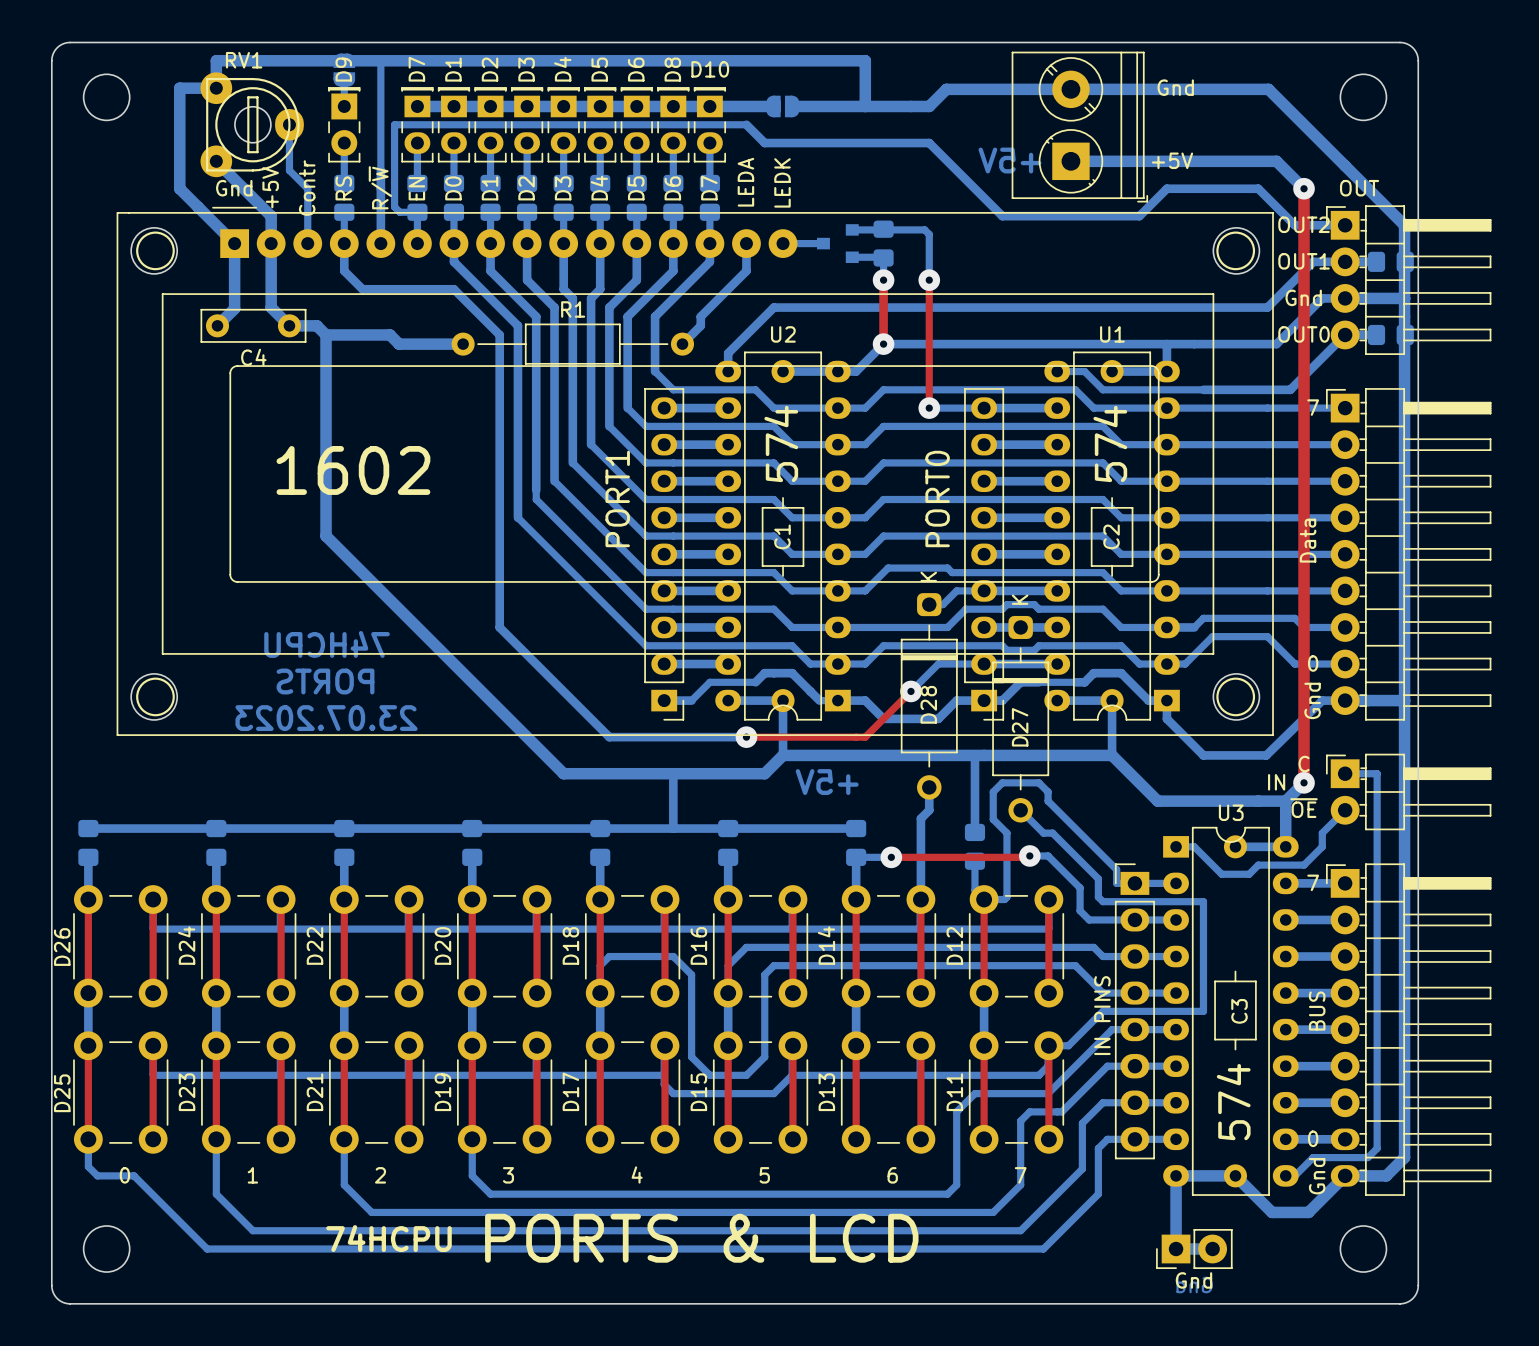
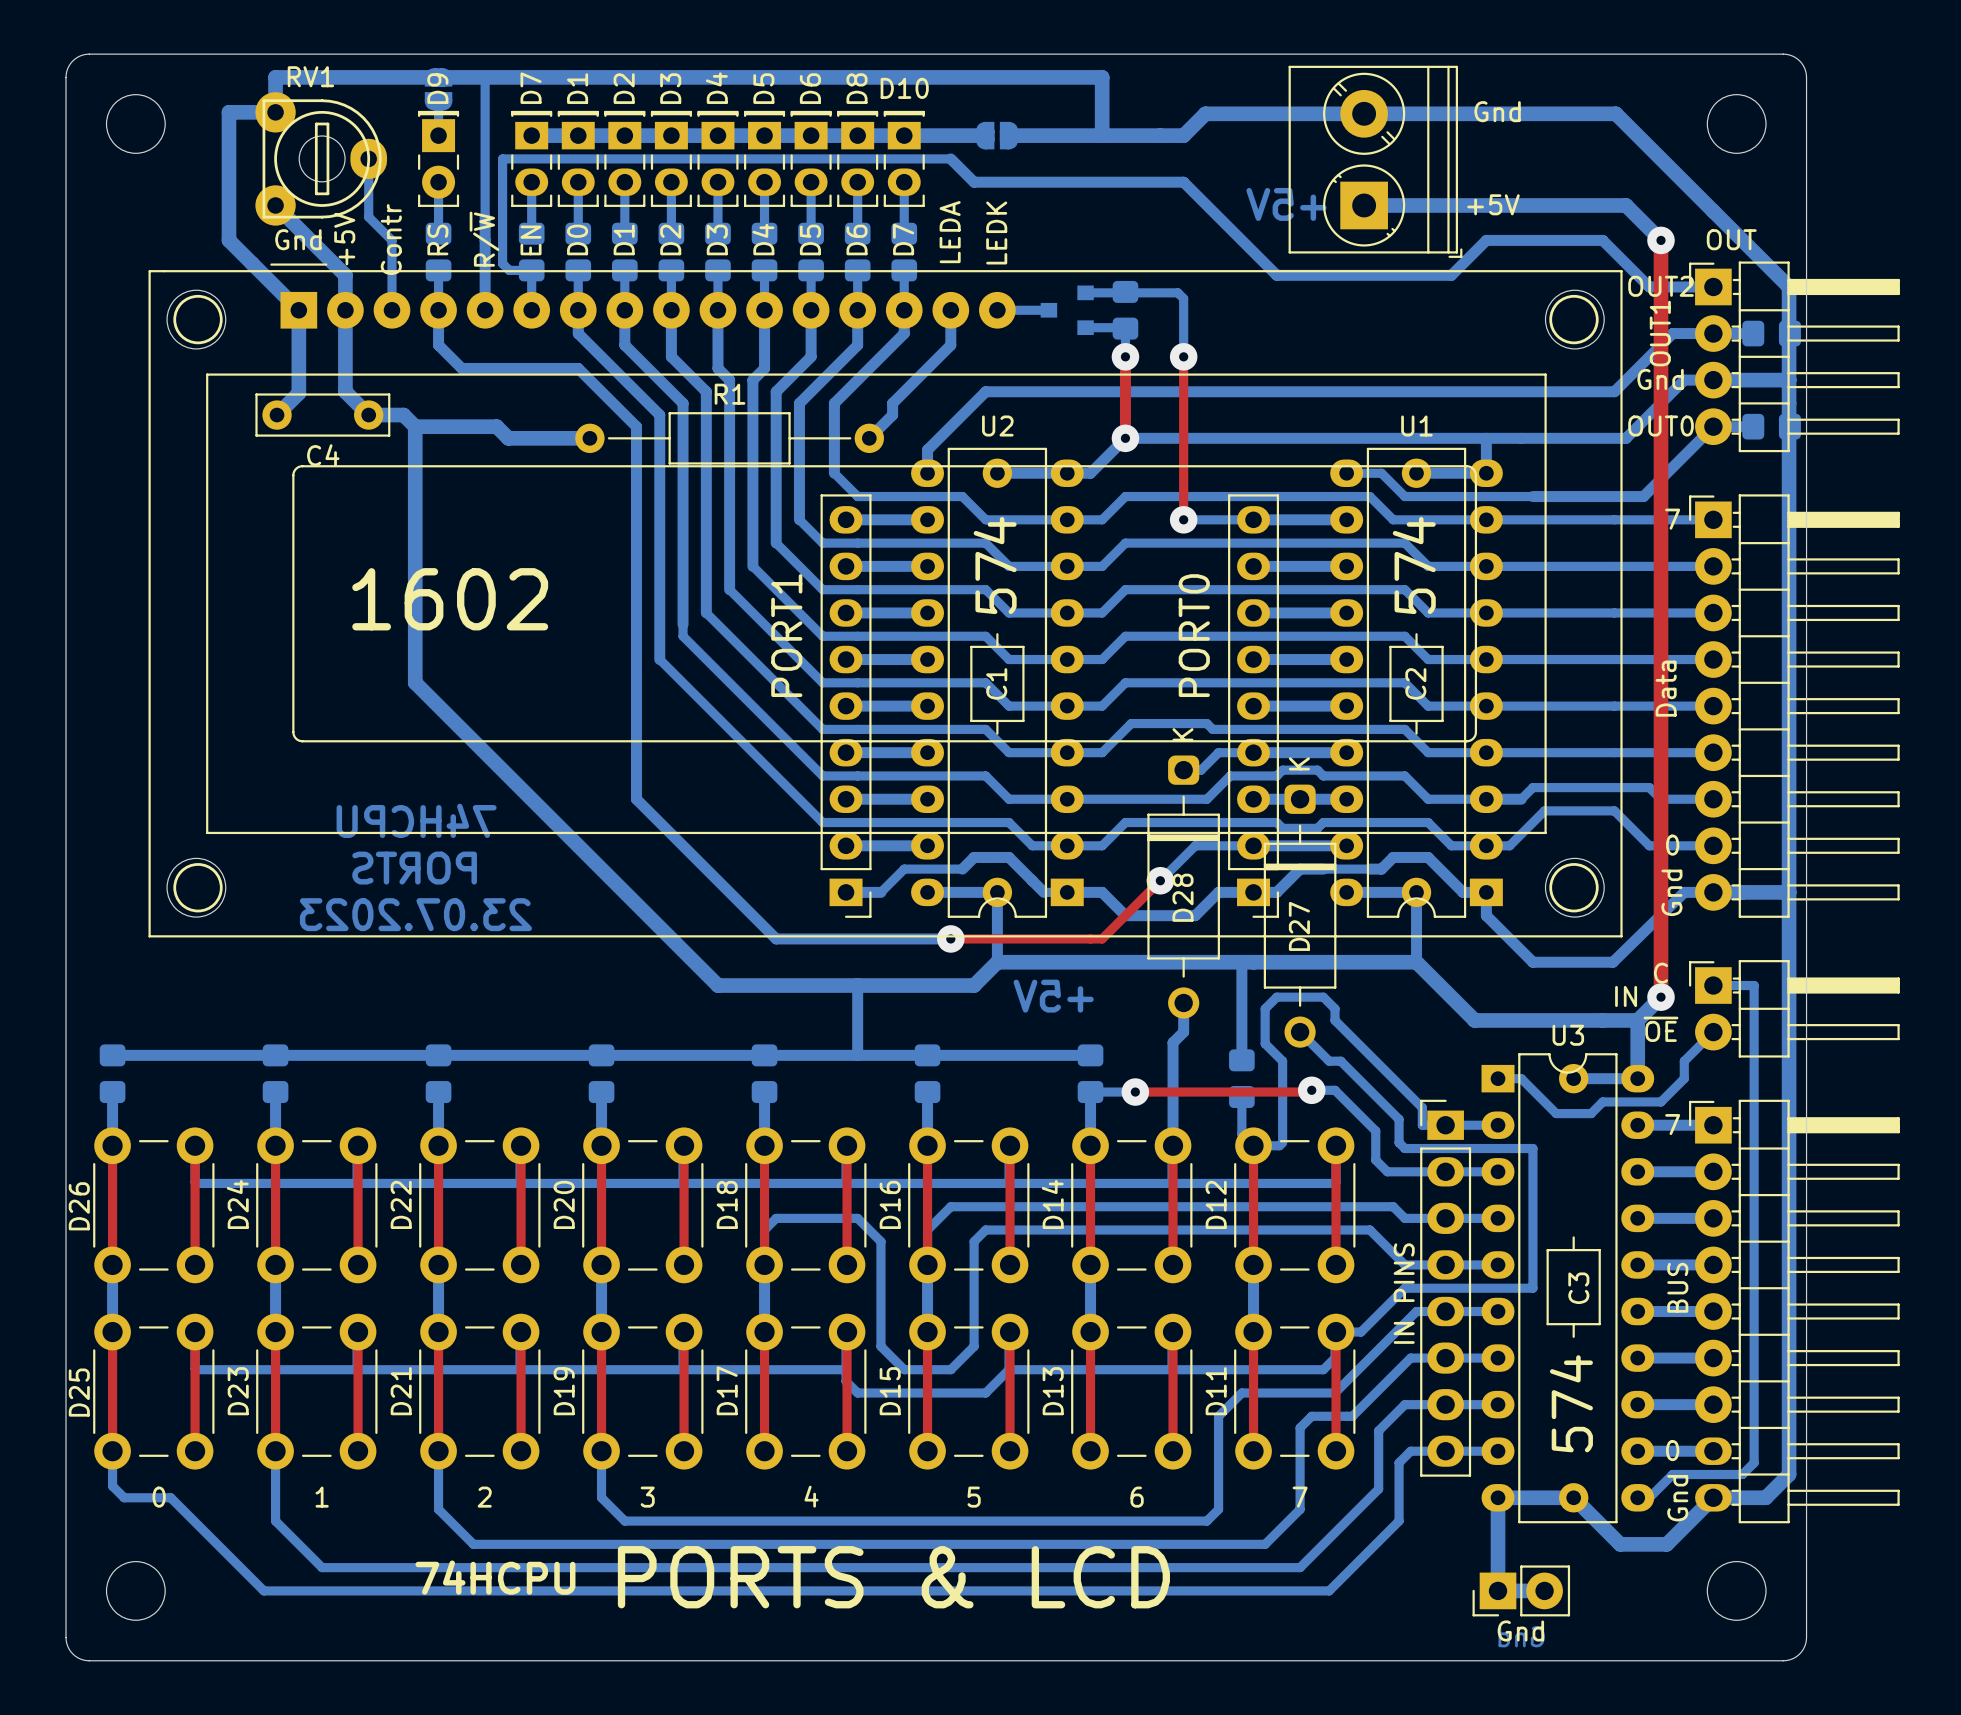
text rotation: 0° (1304, 261) -> 90° counterclockwise (1660, 333)

